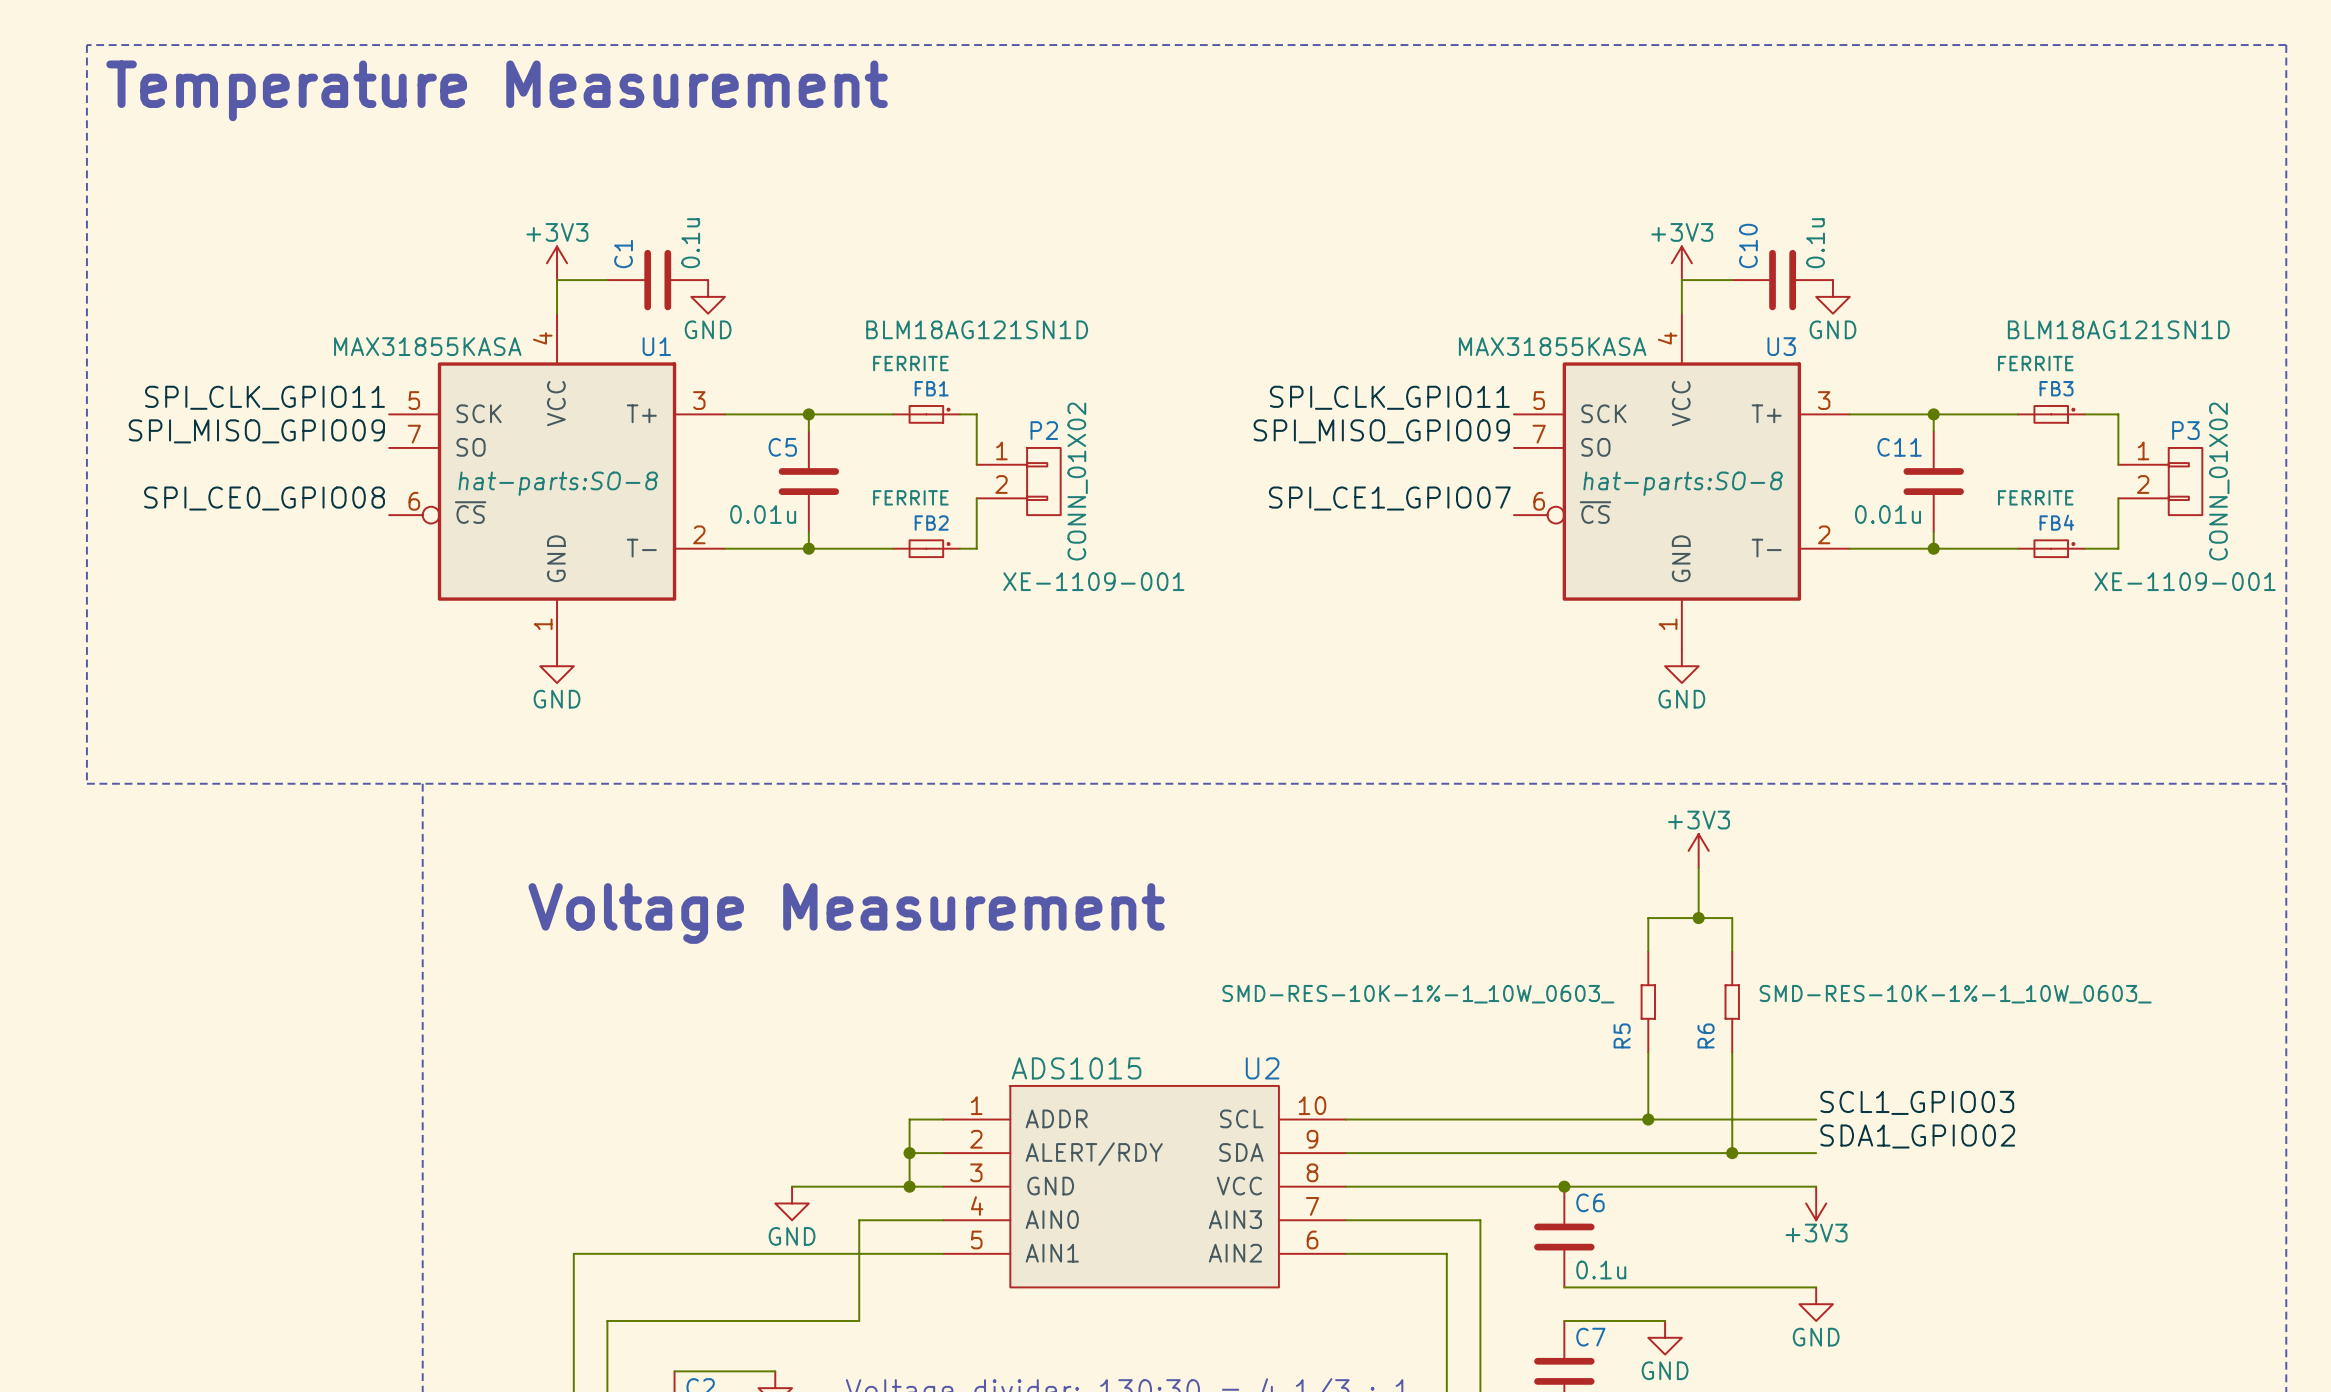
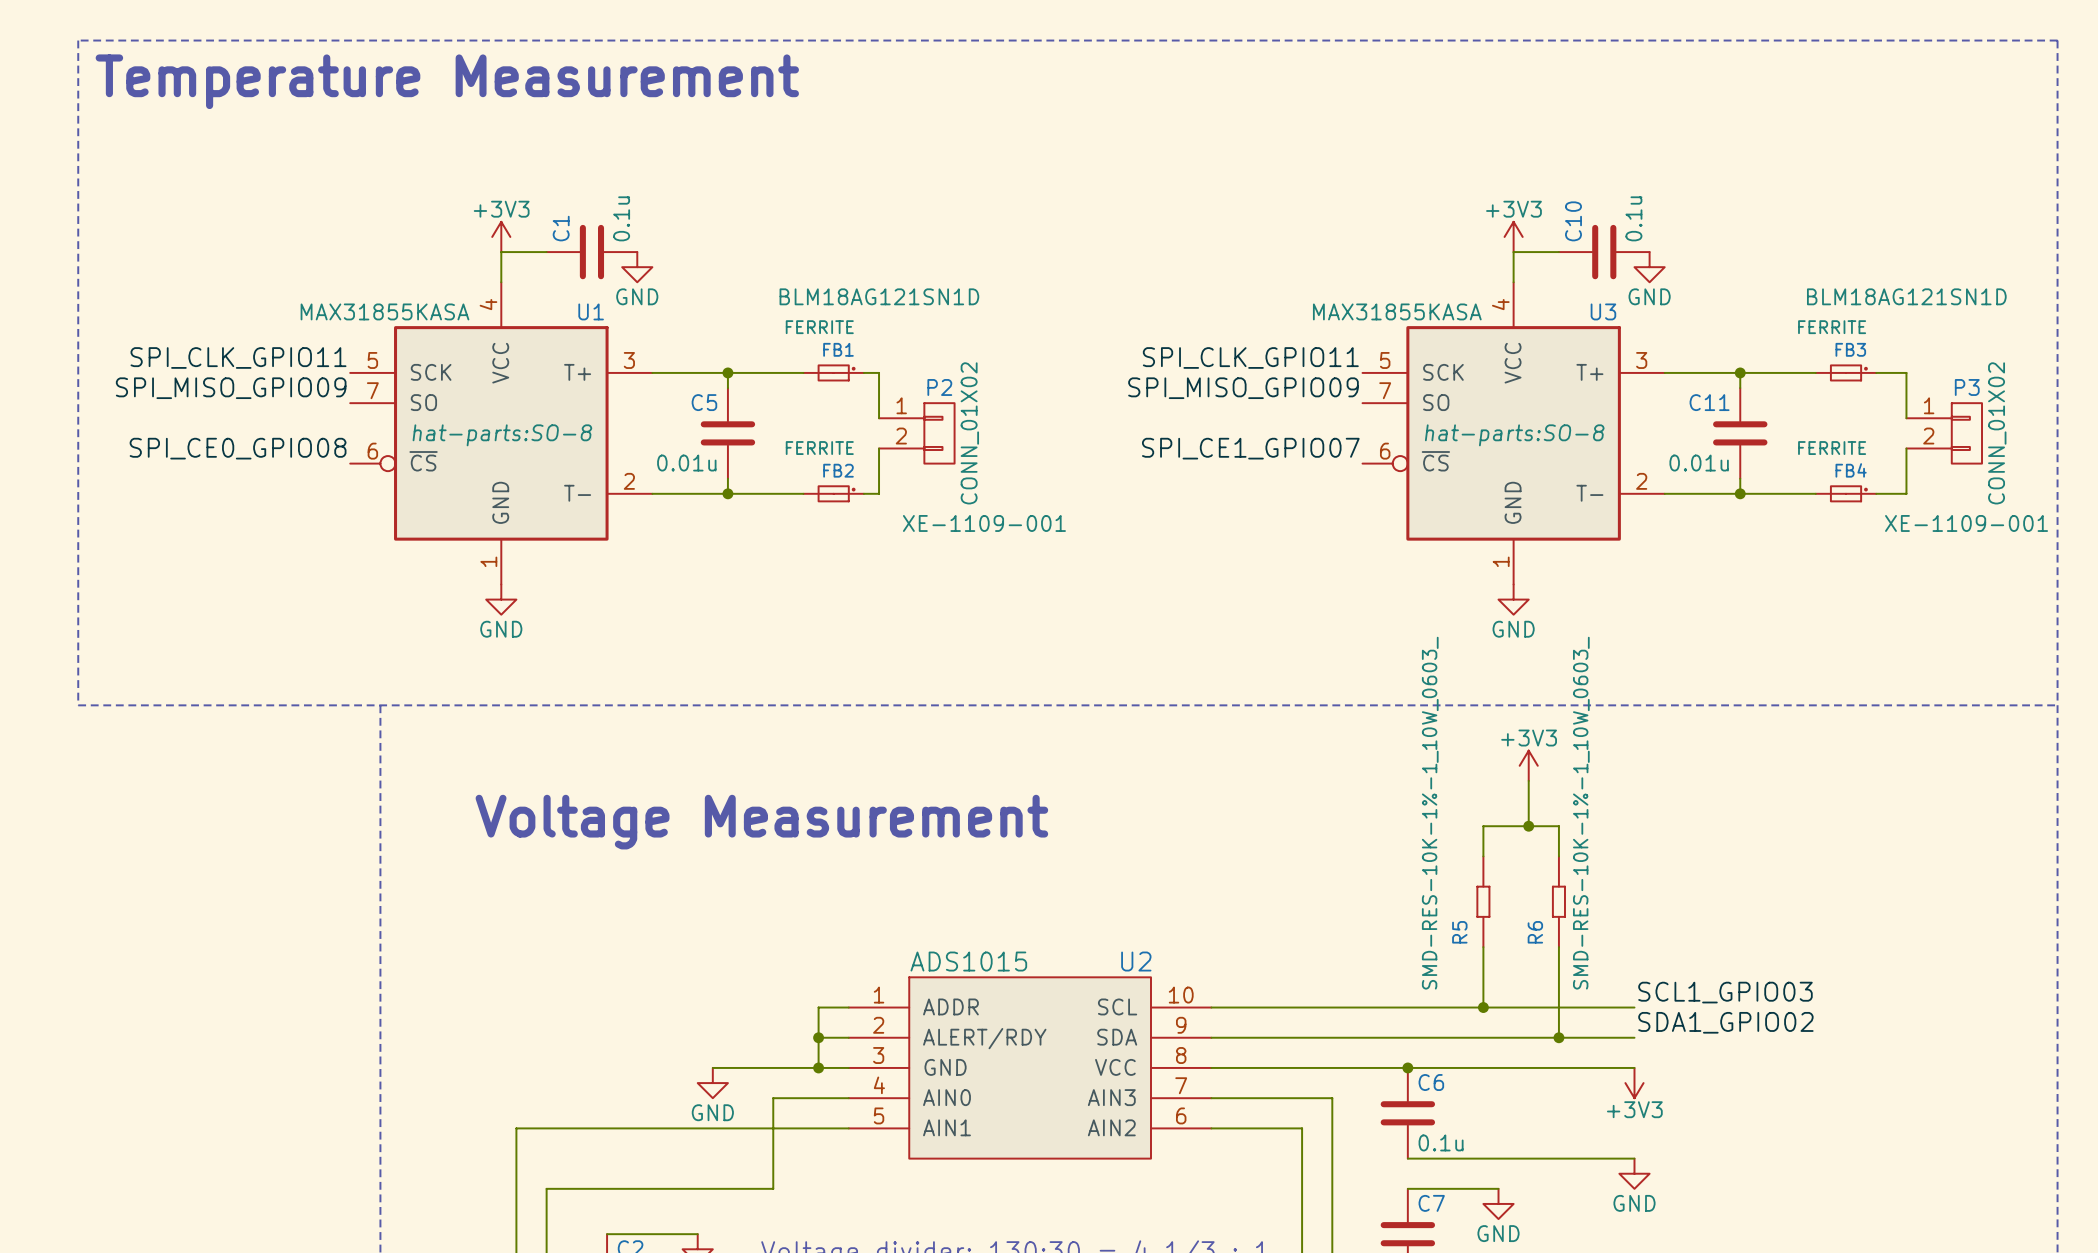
R5 value rotation: 0° (1418, 994) -> 90° counterclockwise (1430, 813)
R6 value rotation: 0° (1955, 994) -> 90° counterclockwise (1581, 813)

